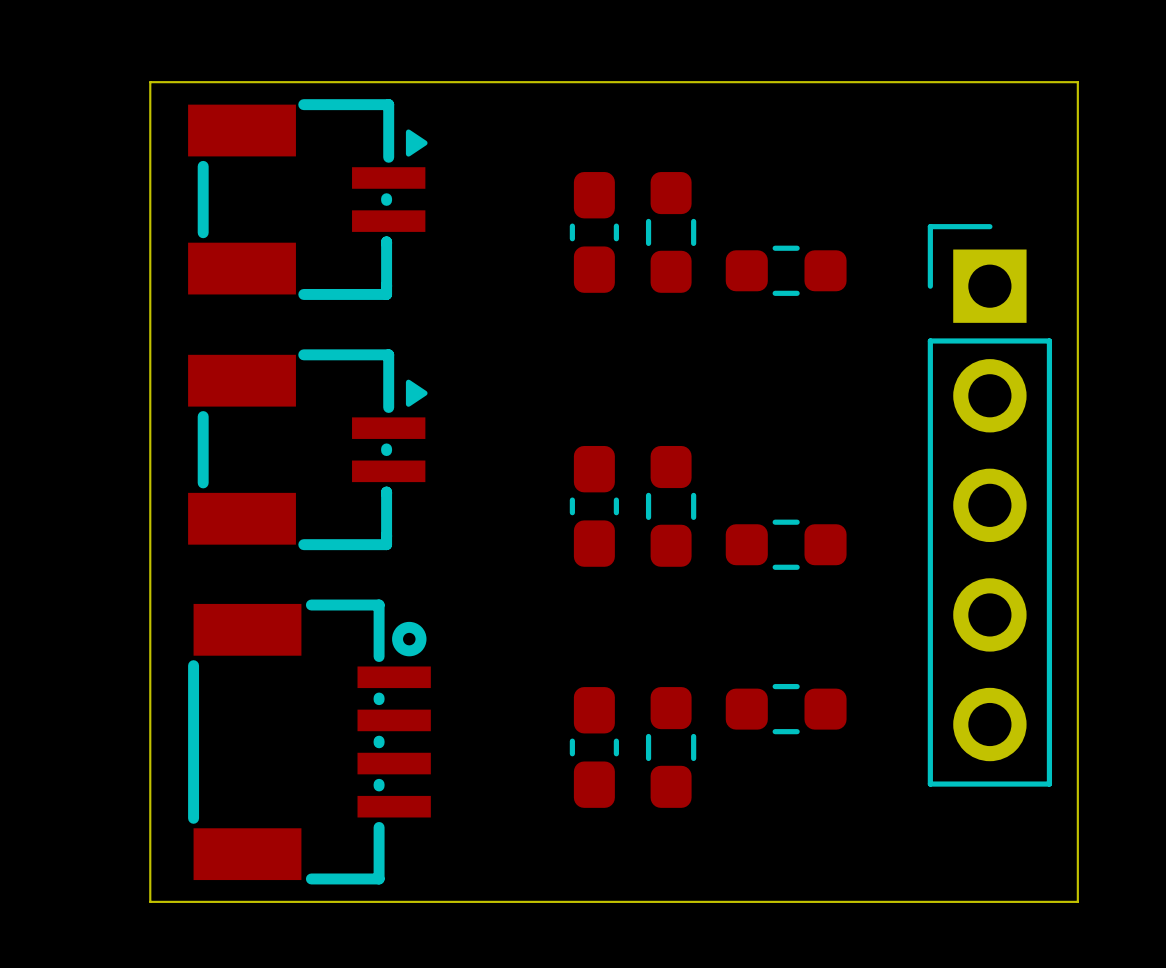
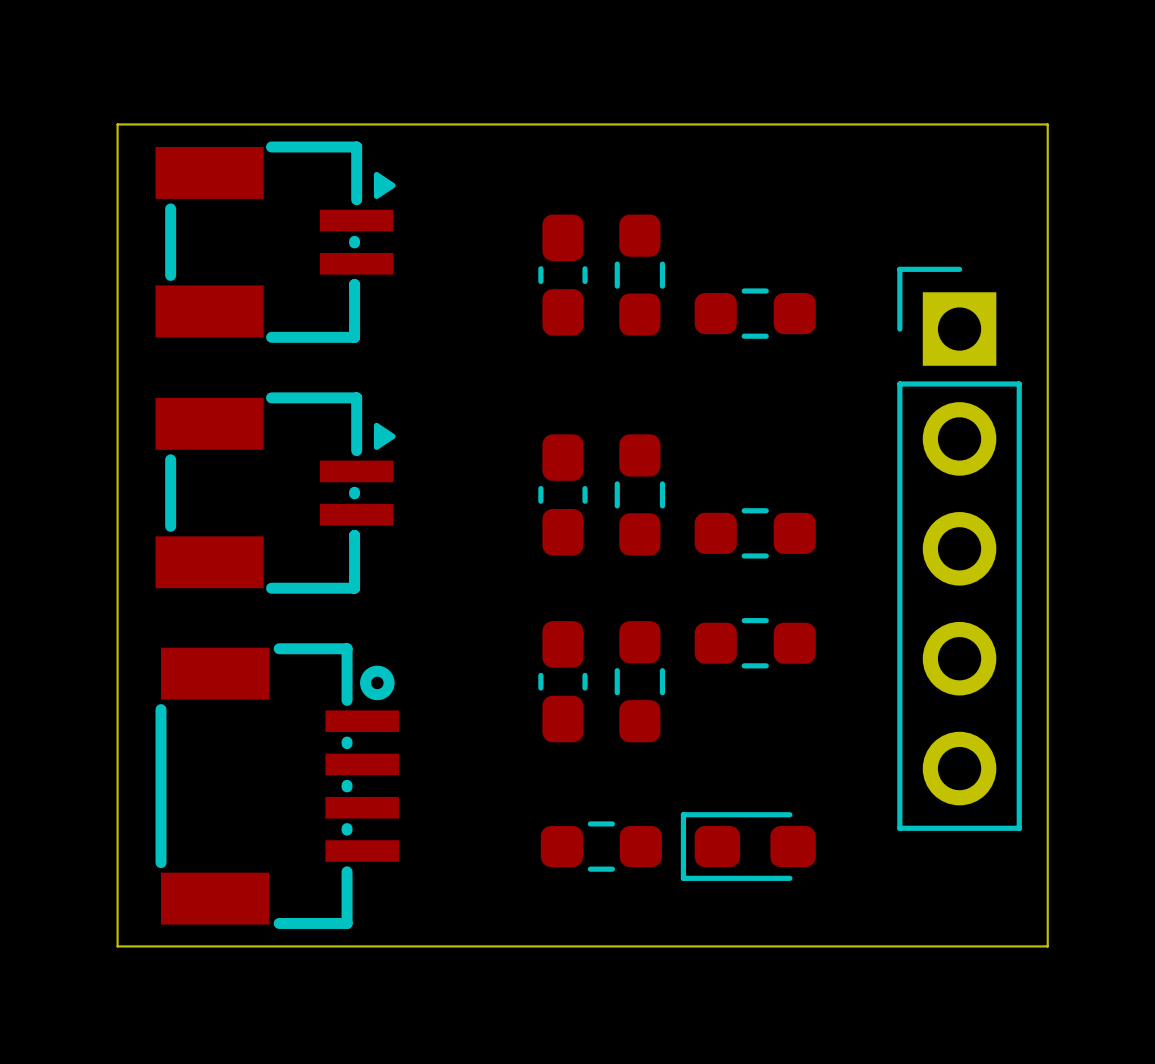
part: none -> (755, 533)
part position: (594, 506) -> (562, 494)
part position: (671, 506) -> (639, 494)
part: (786, 544) -> none
part: none -> (755, 643)
part: none -> (562, 681)
part: none -> (639, 681)
part: (786, 709) -> none
part: (594, 747) -> none
part: (671, 747) -> none
part: none -> (601, 846)
part: none -> (748, 846)

